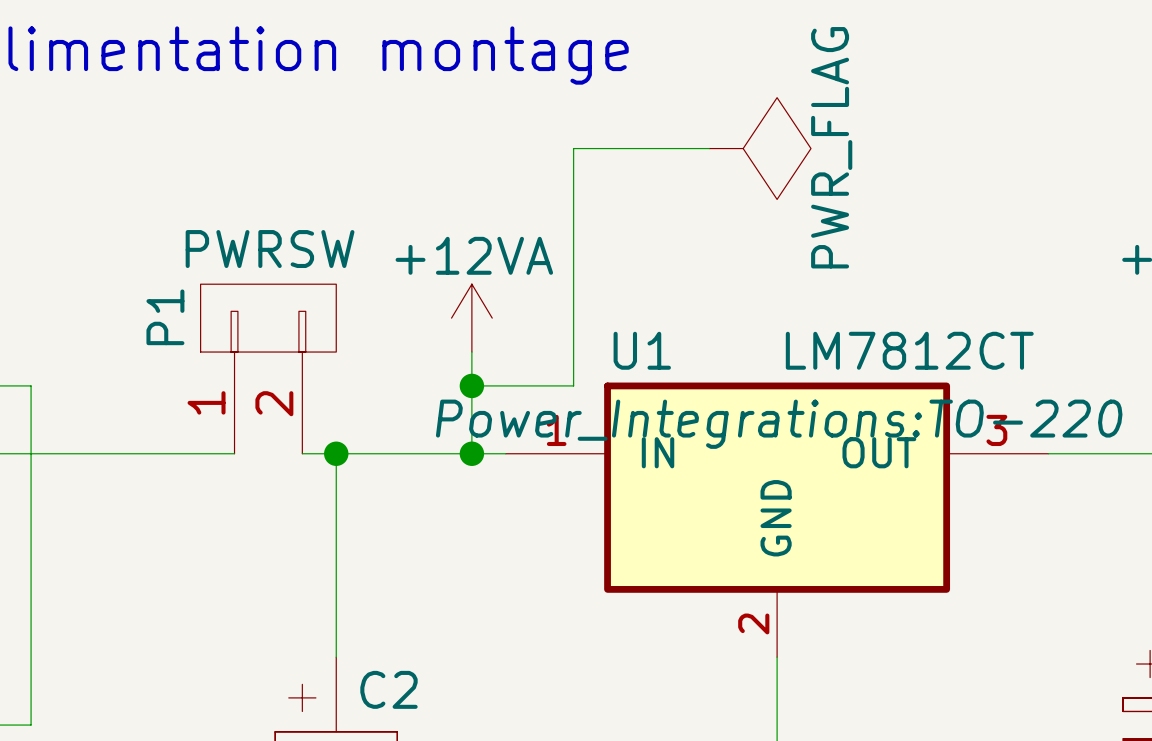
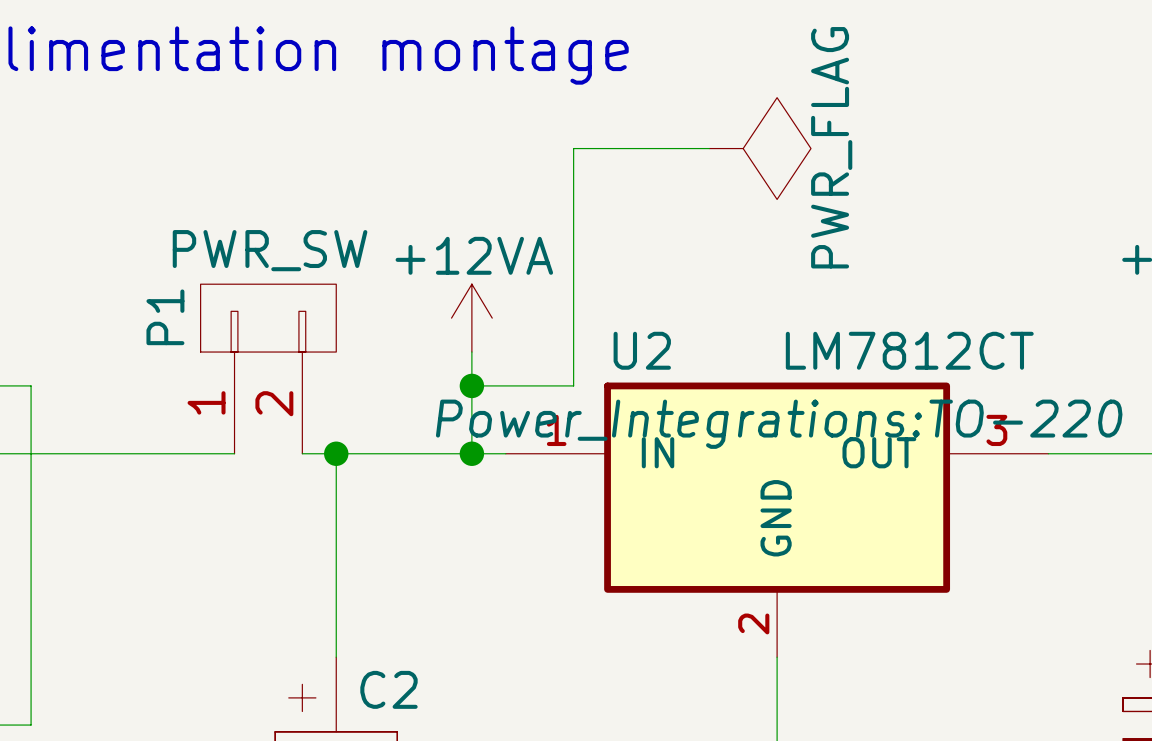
P1 value: PWRSW (270, 249) -> PWR_SW (270, 250)
U1 name: U1 (642, 350) -> U2 (642, 350)

